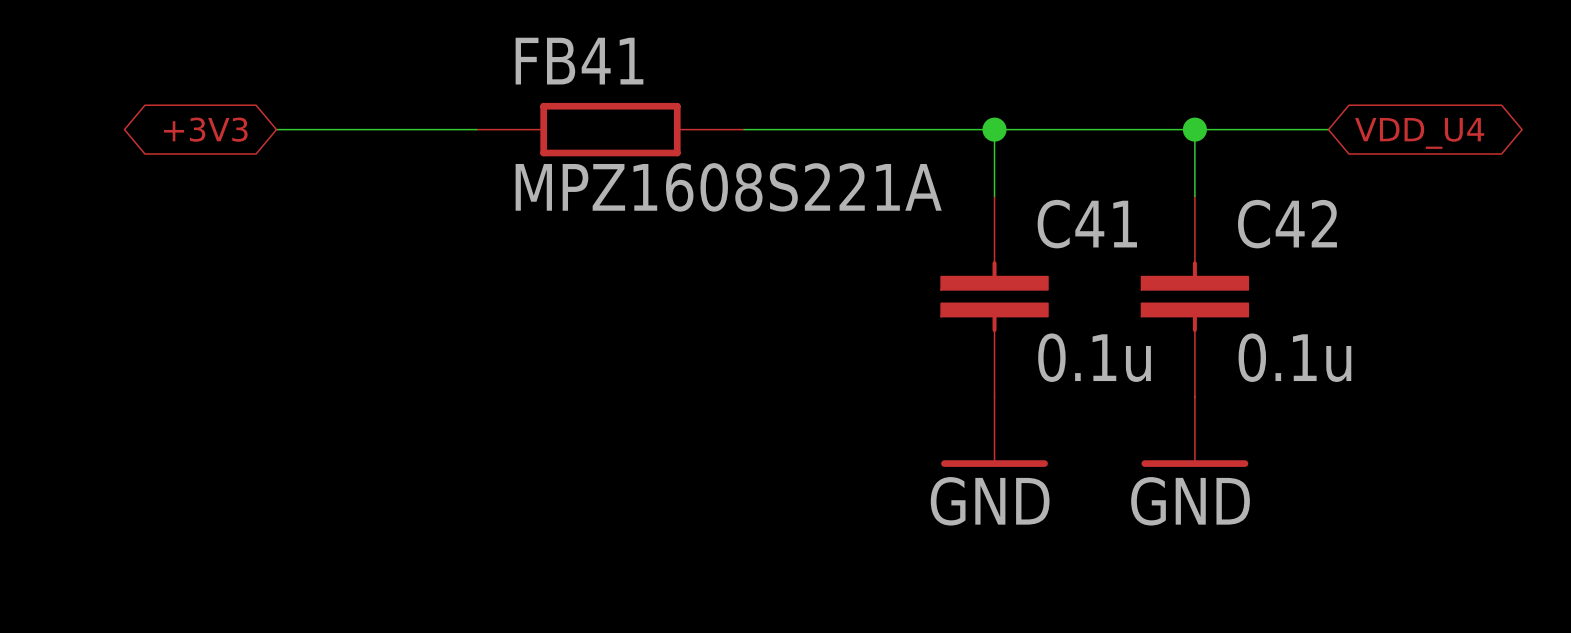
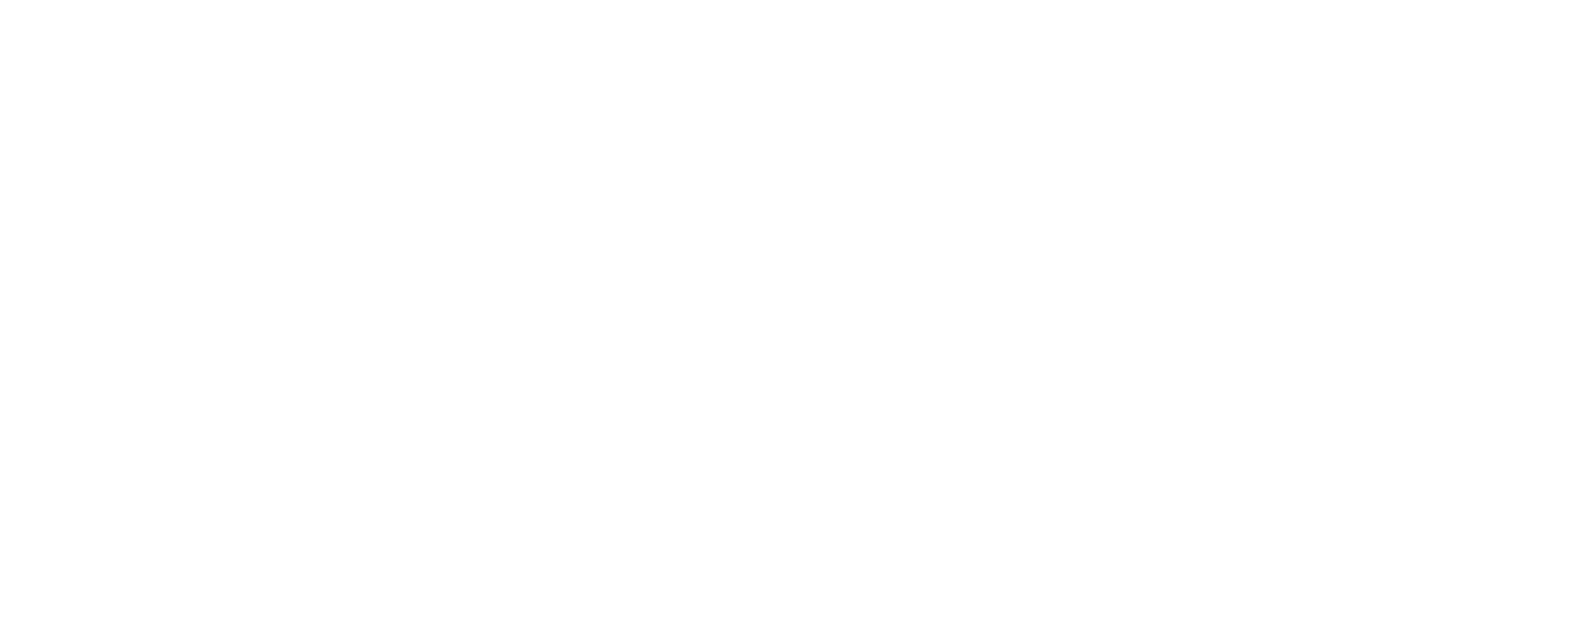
global label: +3V3 (205, 129) -> none
wire: (276, 129) (476, 129) -> none
FB41: MPZ1608S221A (610, 129) -> none
wire: (744, 129) (1328, 129) -> none
wire: (994, 129) (994, 196) -> none
junction: (994, 129) -> none
wire: (1194, 129) (1194, 196) -> none
junction: (1194, 129) -> none
global label: VDD_U4 (1419, 133) -> none
C41: 0.1u (994, 296) -> none
C42: 0.1u (1194, 296) -> none
power symbol: GND (994, 431) -> none
power symbol: GND (1194, 431) -> none

